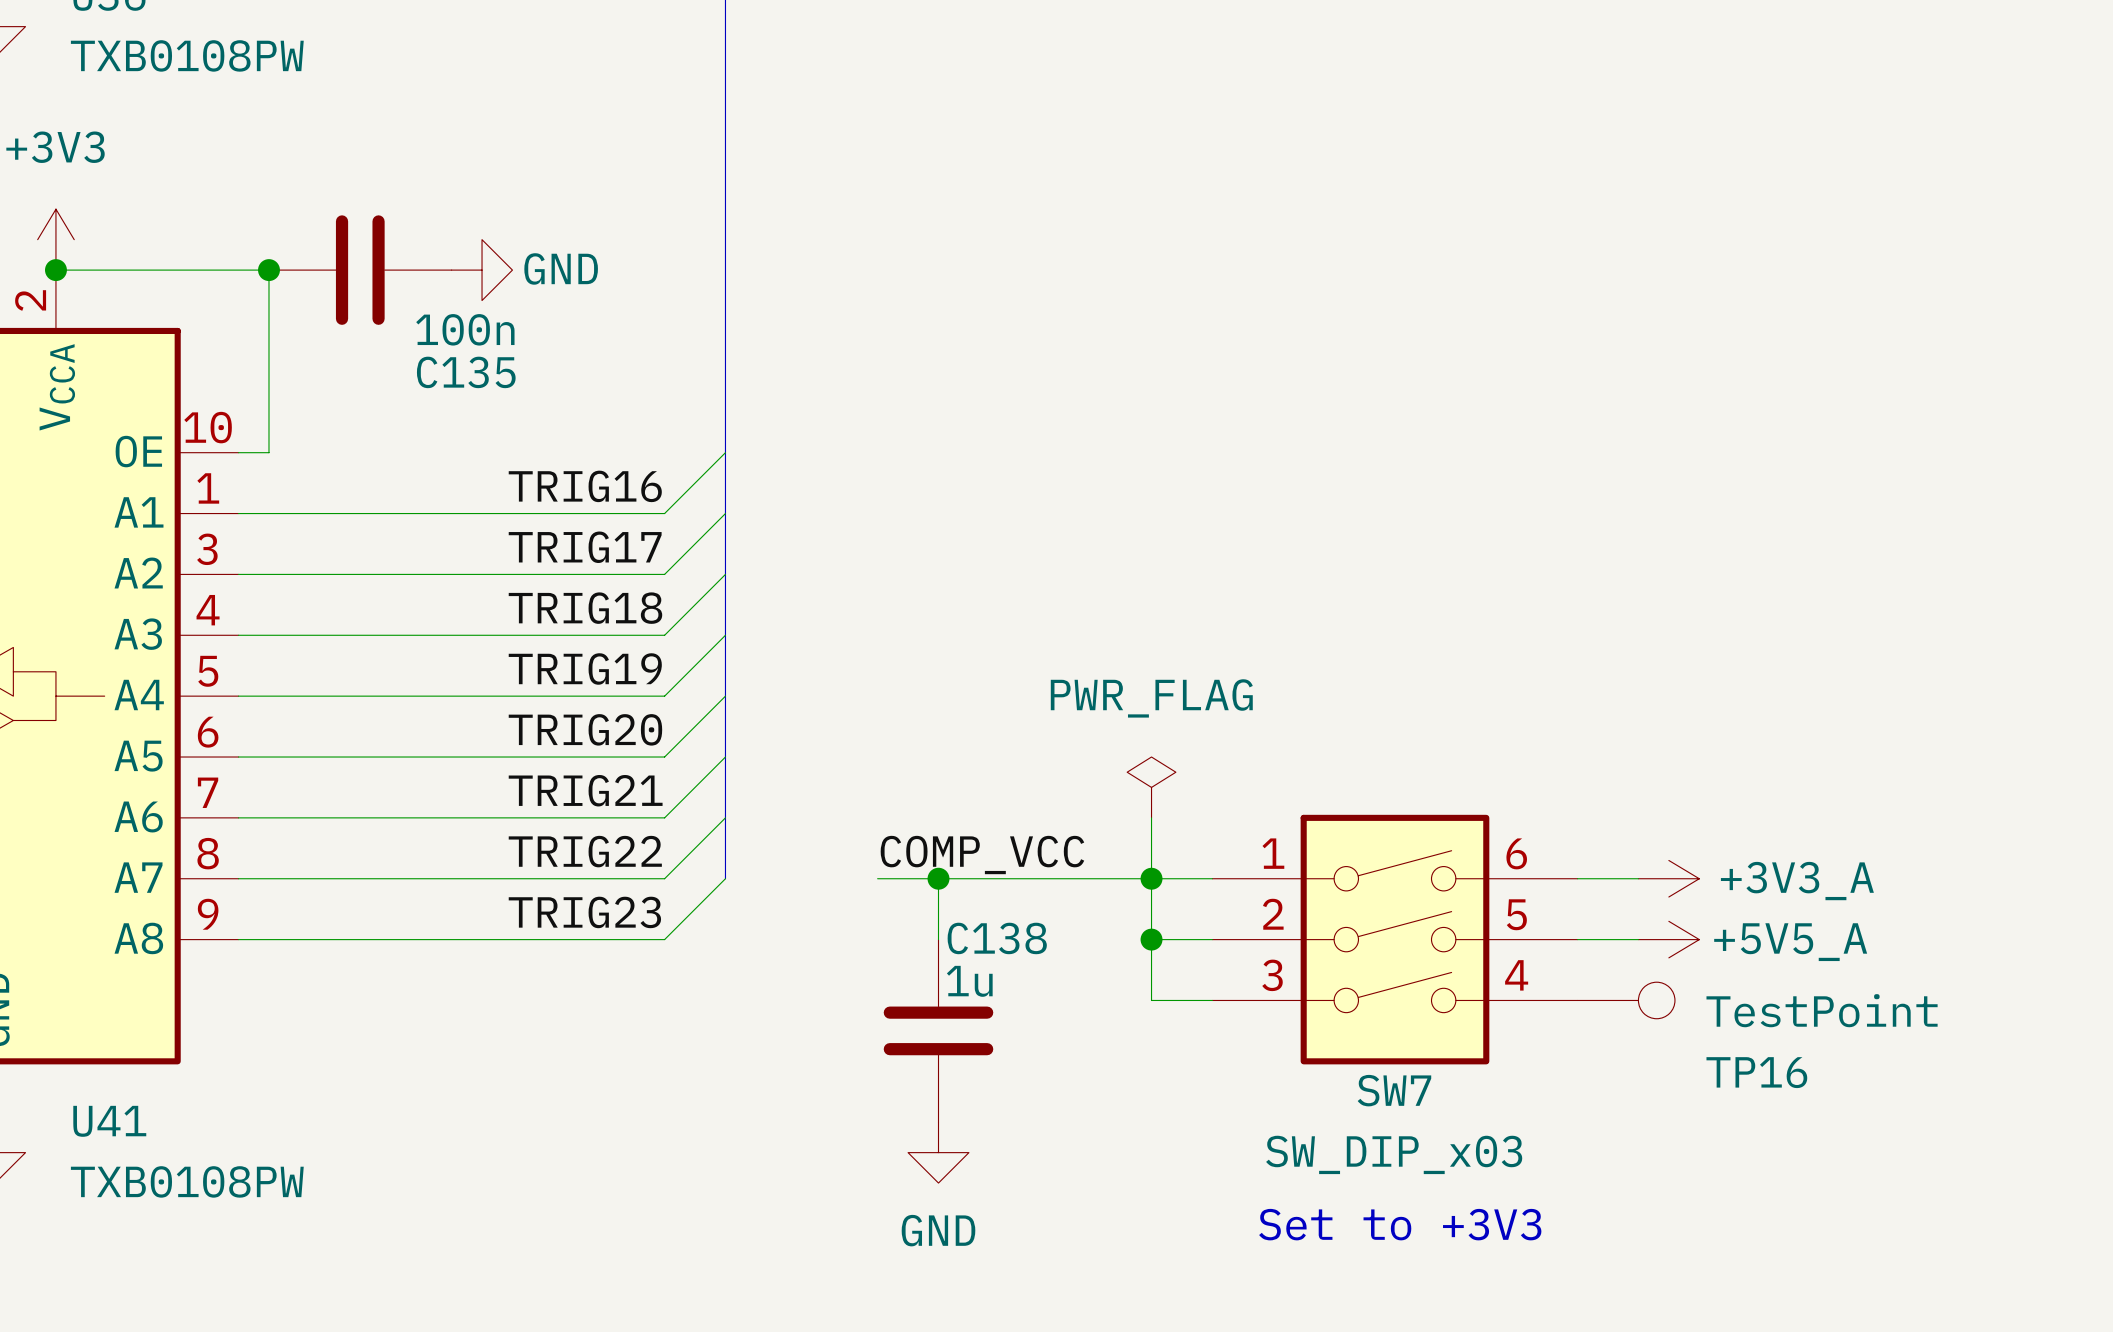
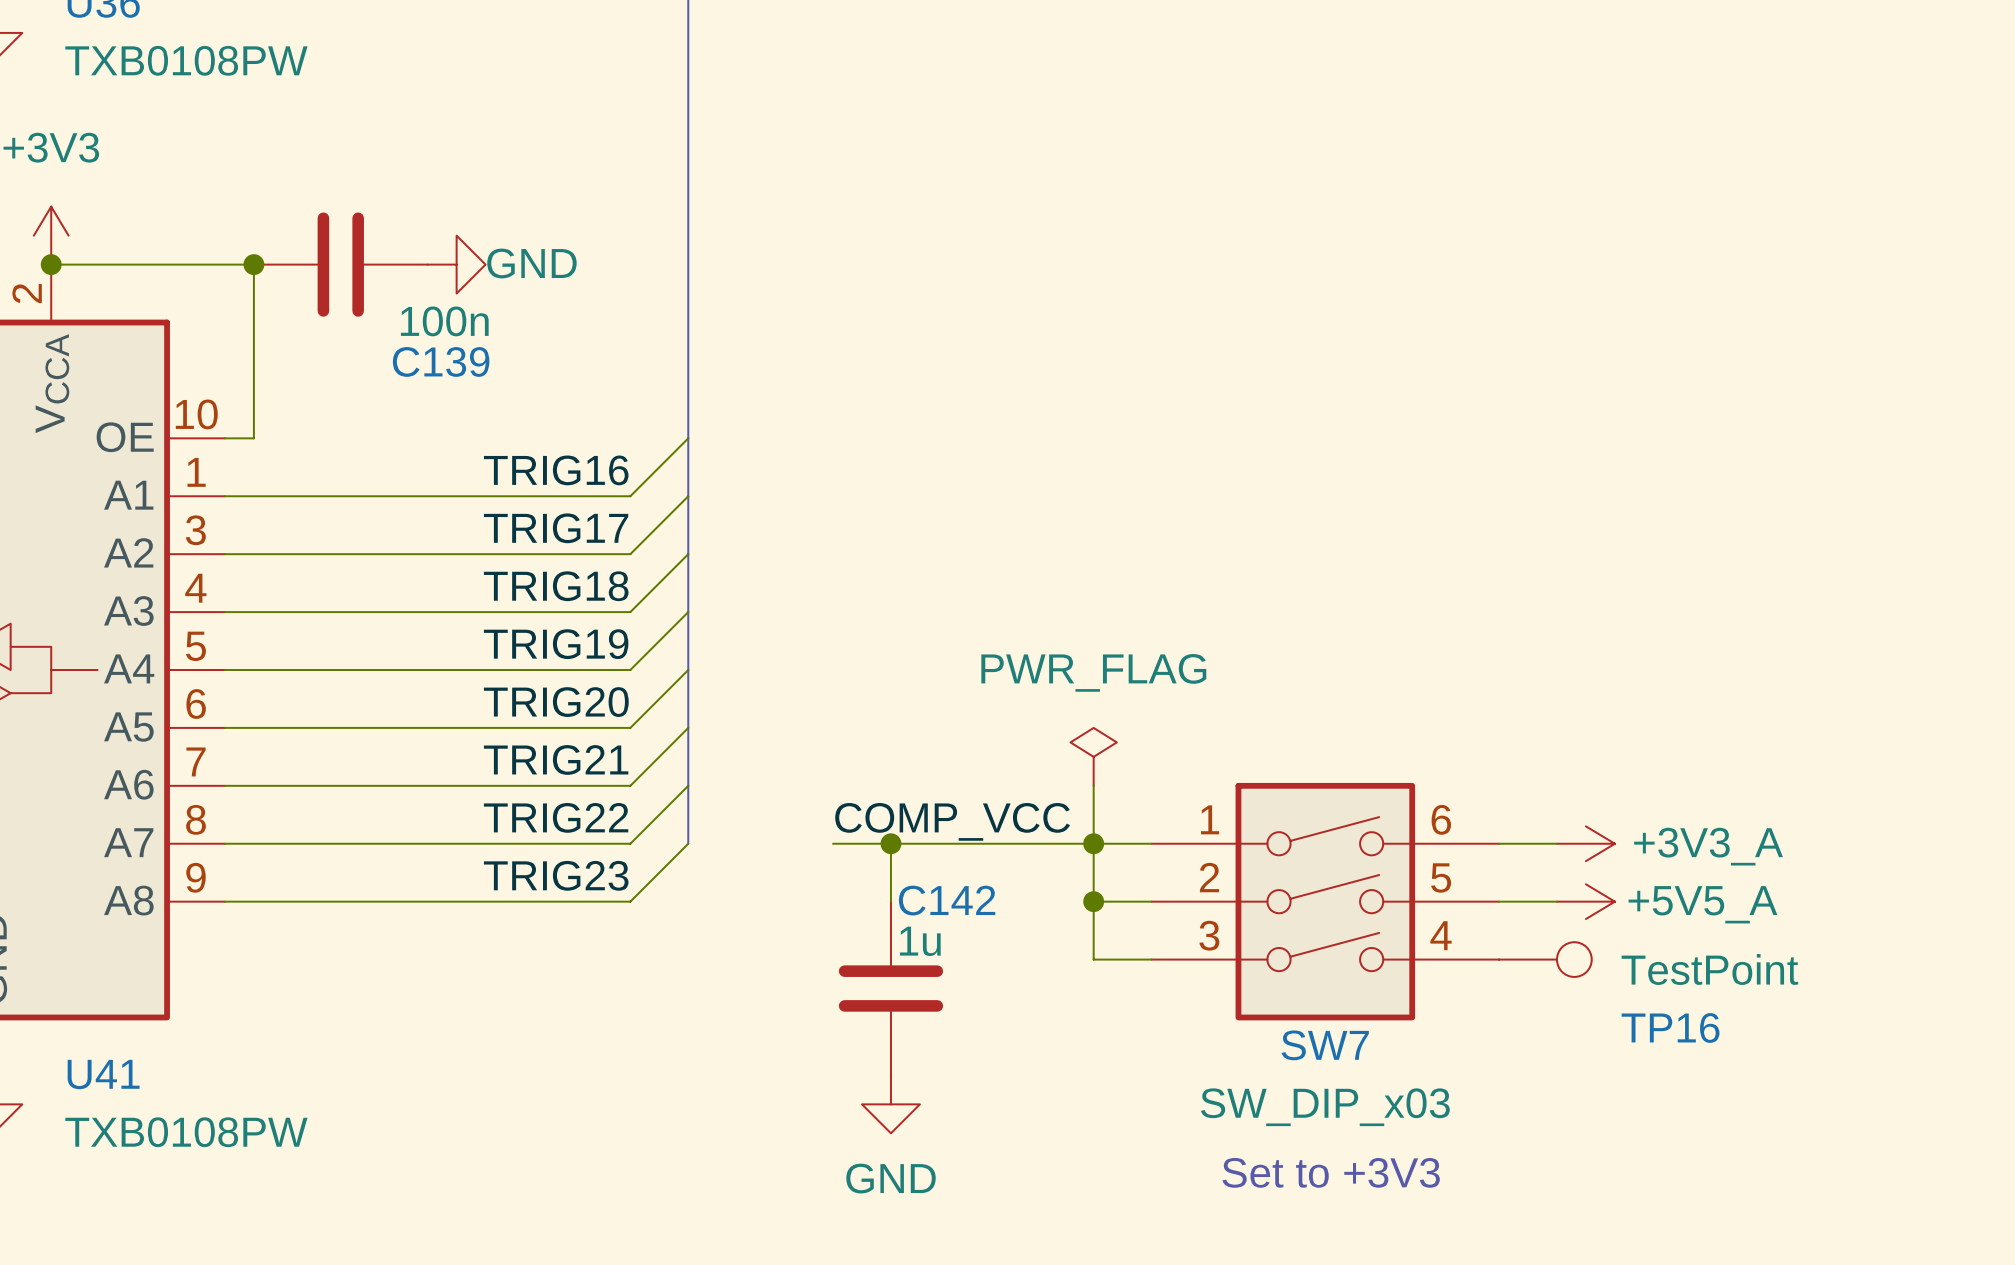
C135 name: C135 (466, 372) -> C139 (441, 361)
C138 name: C138 (997, 938) -> C142 (947, 900)

